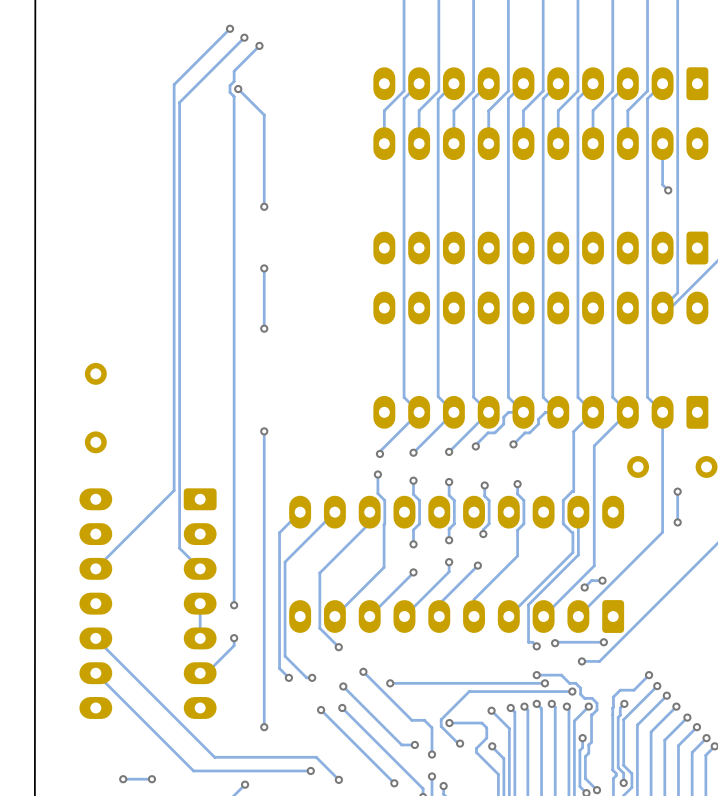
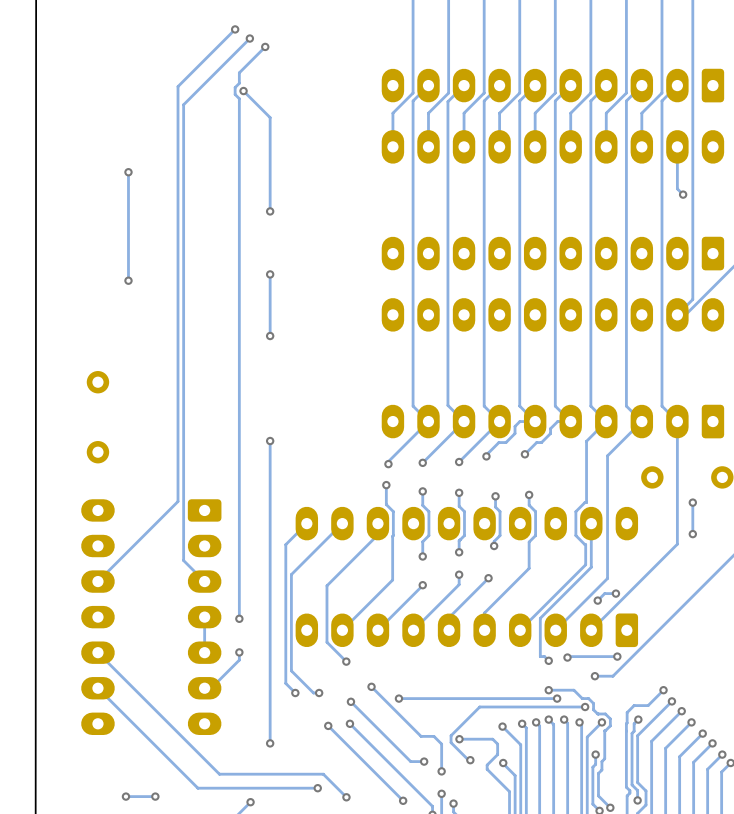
track: none -> (128, 172) (128, 280)
via: none -> (128, 172)
via: none -> (128, 280)

